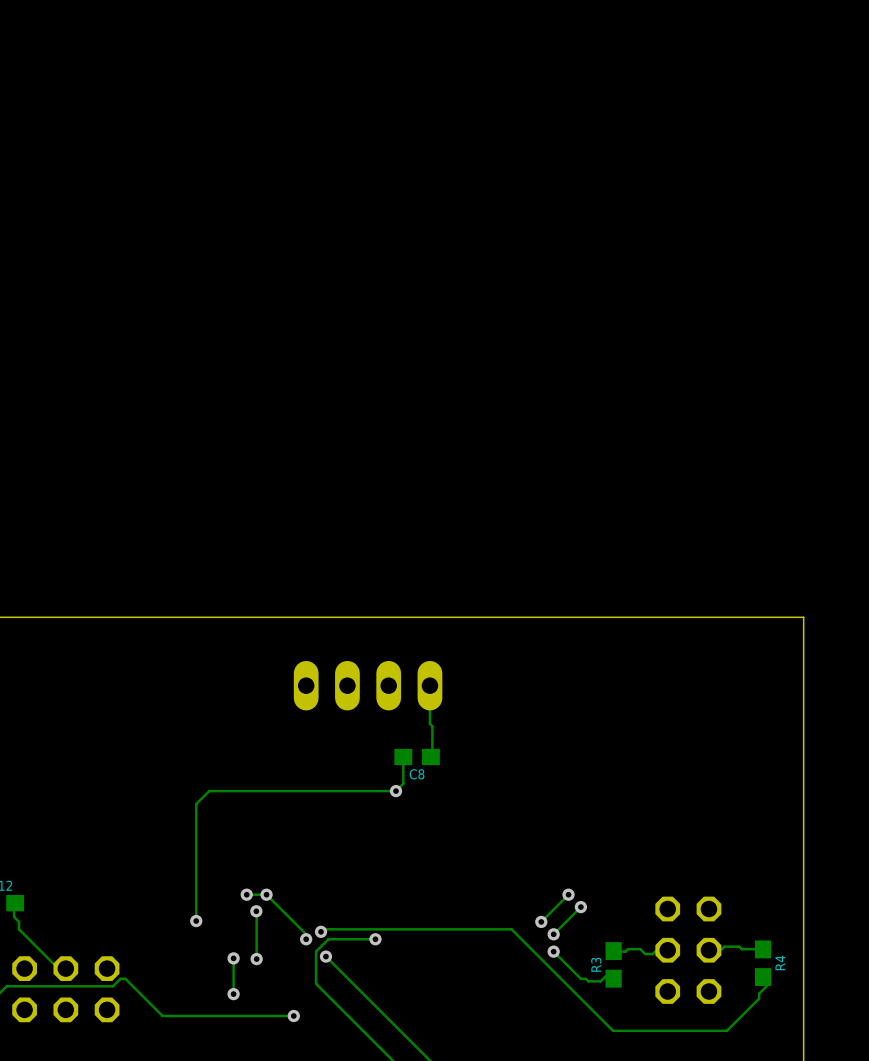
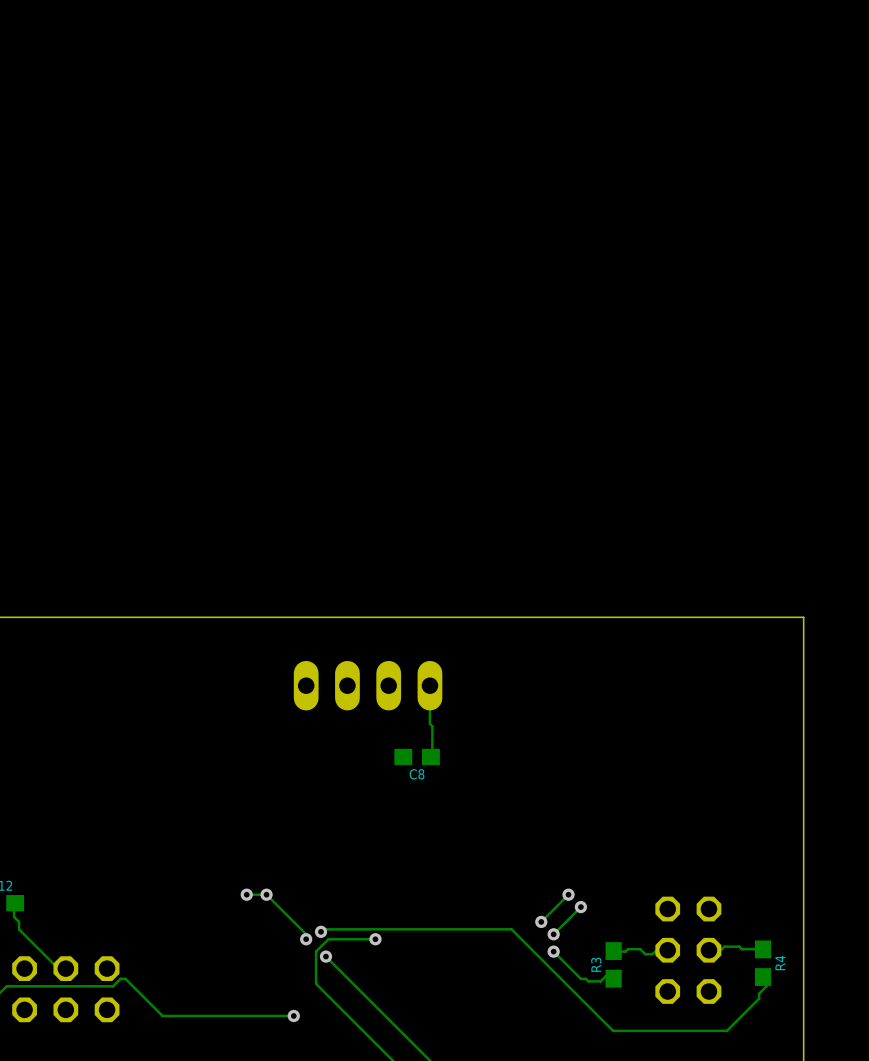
track: (403, 756) (403, 783) (396, 791) (209, 791) (196, 804) (196, 921) -> none
via: (396, 791) -> none
track: (256, 911) (256, 959) -> none
via: (256, 911) -> none
via: (196, 921) -> none
track: (233, 958) (233, 994) -> none
via: (233, 958) -> none
via: (256, 959) -> none
via: (233, 994) -> none

